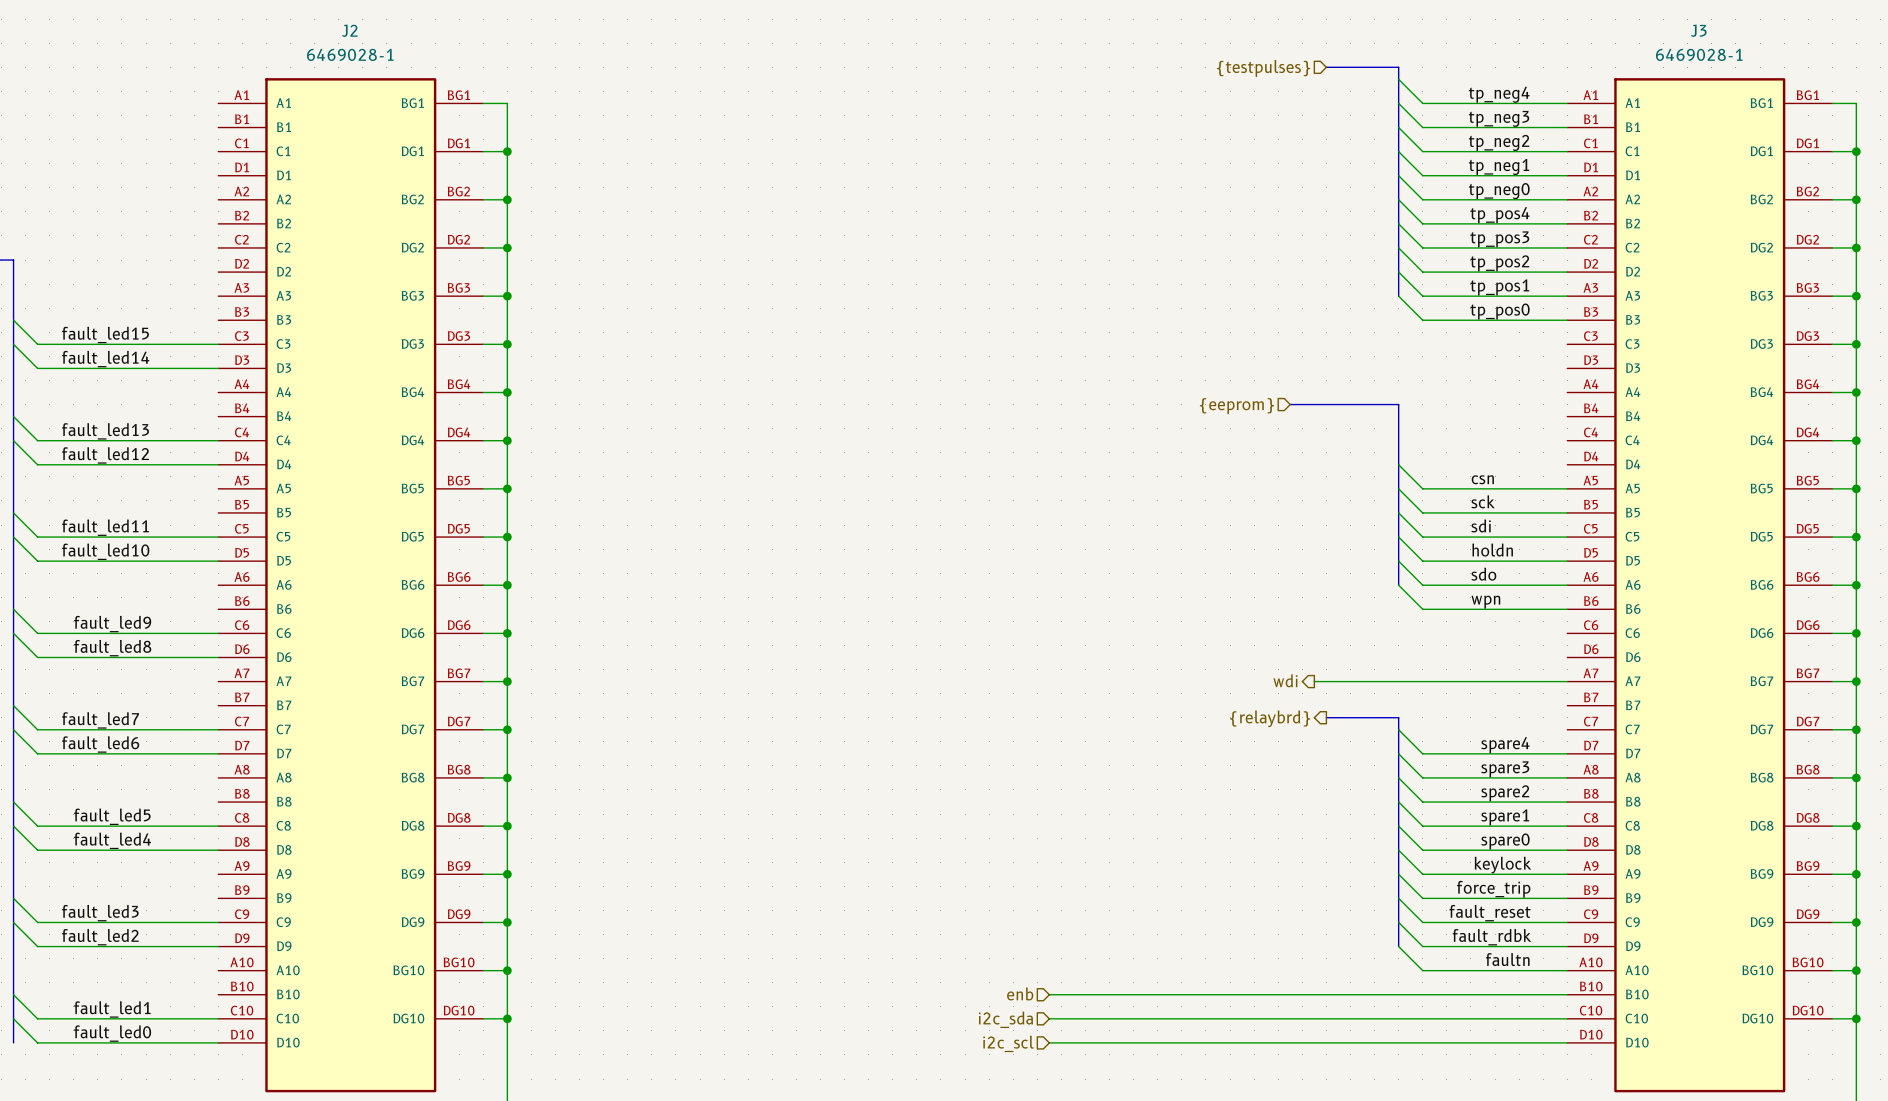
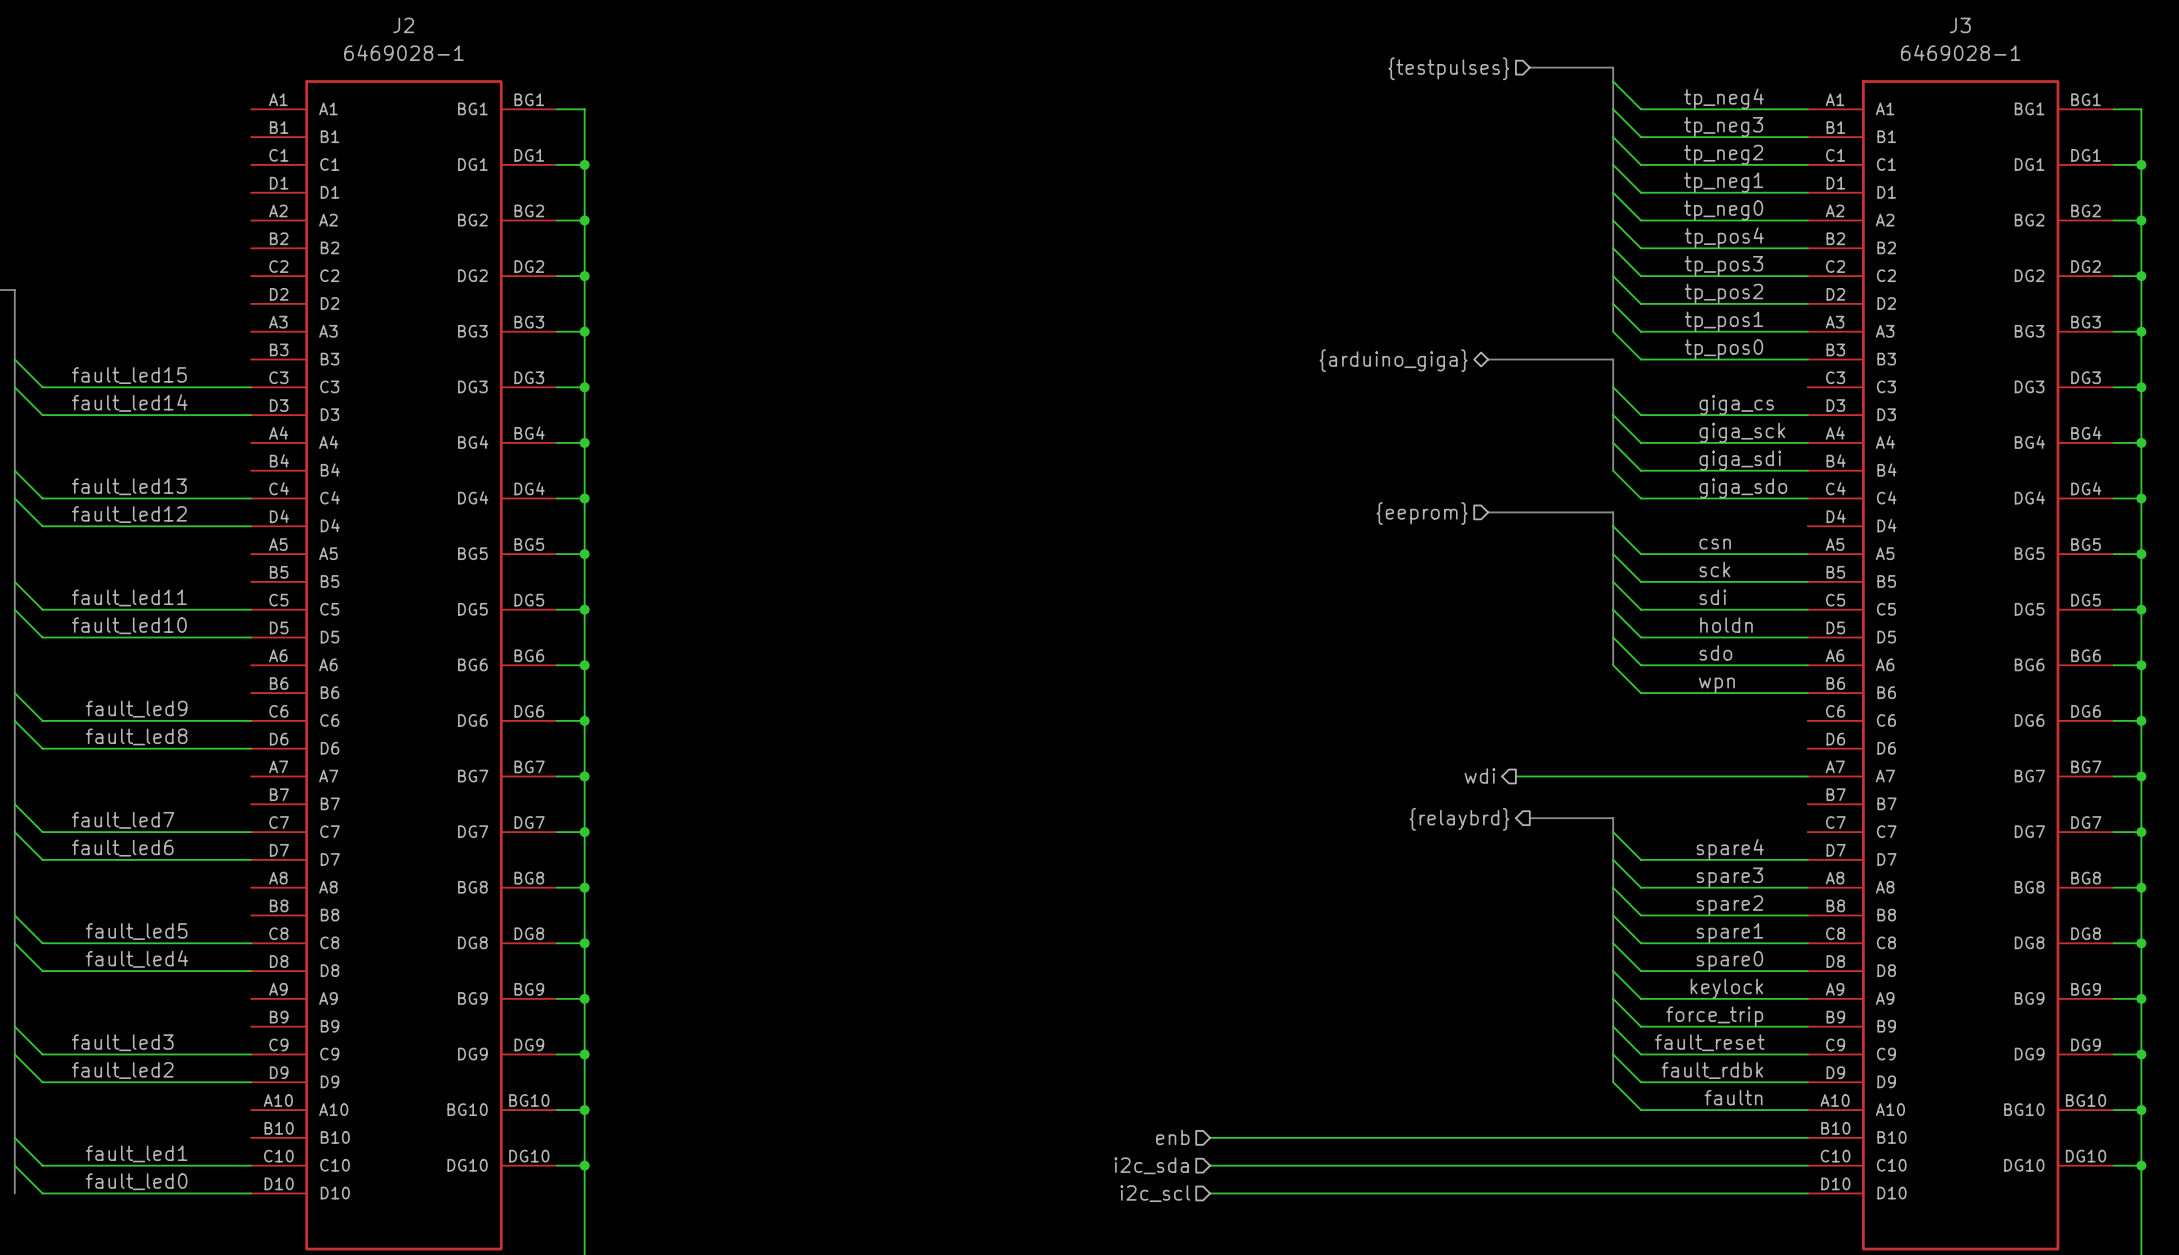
hierarchical label: none -> {arduino_giga} (1393, 360)
wire: none -> (1613, 387) (1640, 415) (1807, 415)
label: none -> giga_cs (1736, 405)
wire: none -> (1613, 415) (1640, 442) (1807, 442)
label: none -> giga_sck (1742, 432)
wire: none -> (1613, 442) (1640, 470) (1807, 470)
bus: (1290, 404) (1398, 404) -> (1488, 359) (1613, 359) (1613, 456)
hierarchical label position: {eeprom} (1236, 406) -> {eeprom} (1422, 513)
label: none -> giga_sdi (1740, 460)
wire: none -> (1613, 470) (1640, 498) (1807, 498)
bus: (1398, 416) (1398, 452) -> (1488, 512) (1613, 512)
label: none -> giga_sdo (1743, 488)

